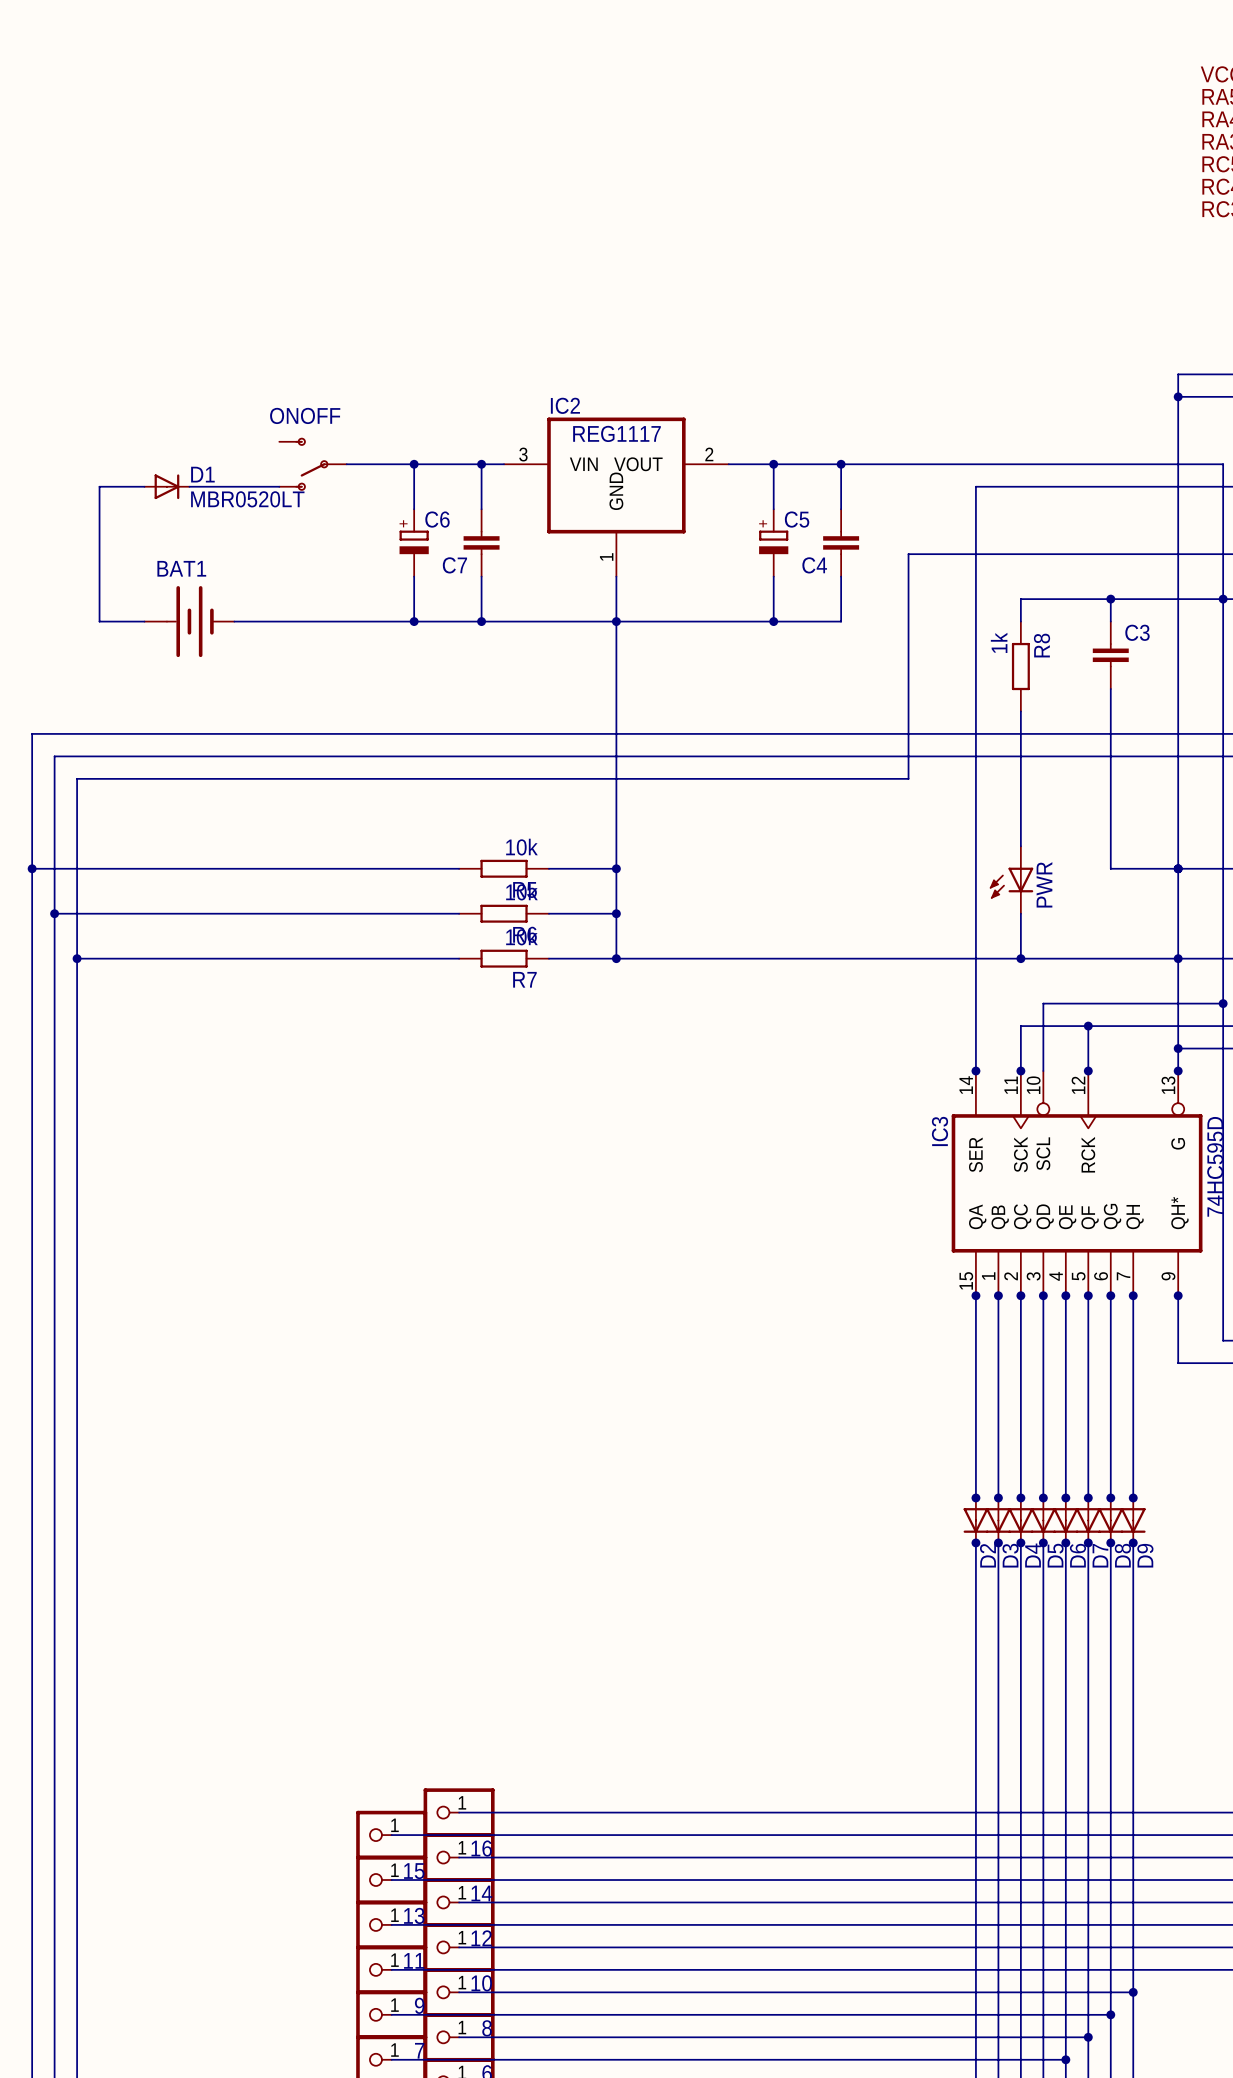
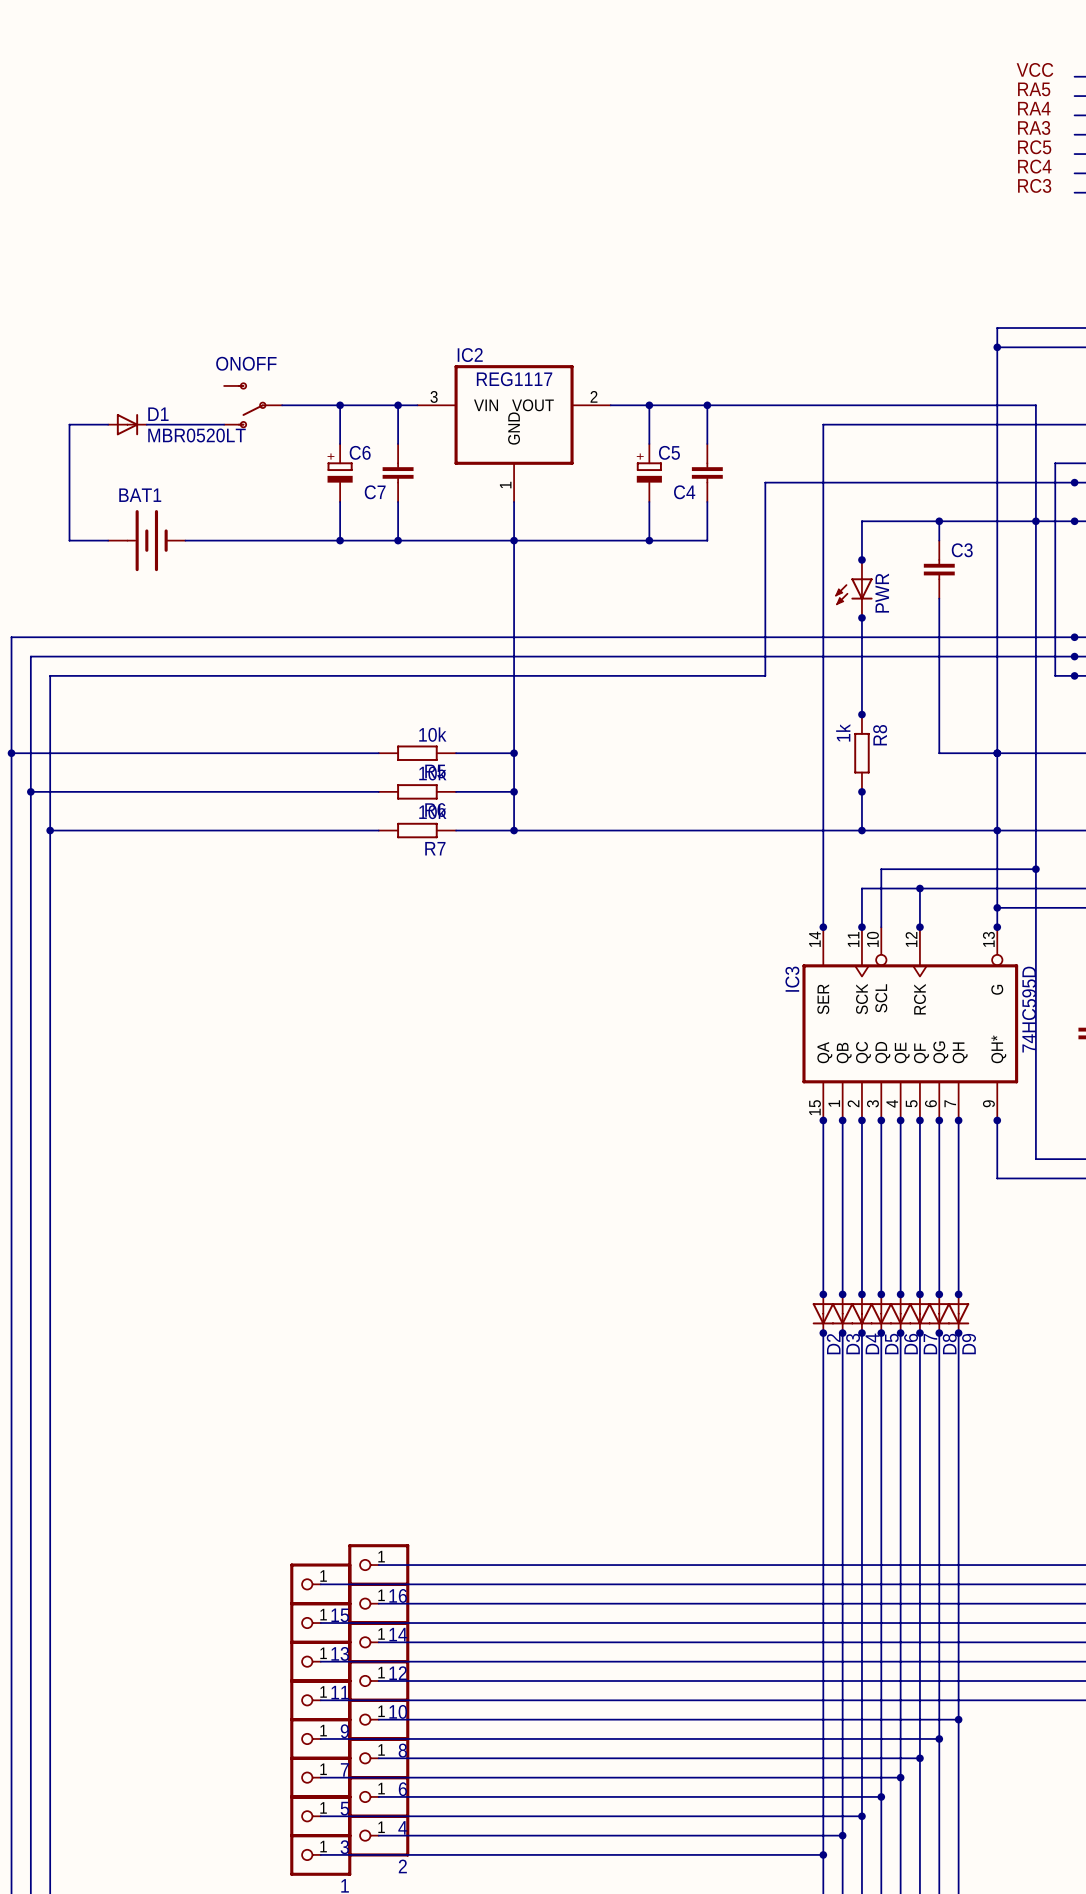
junction: none -> (861, 559)
R8 position: (1020, 666) -> (861, 753)
junction: none -> (861, 617)
junction: none -> (861, 714)
PWR position: (1011, 880) -> (853, 588)
junction: none -> (861, 791)

